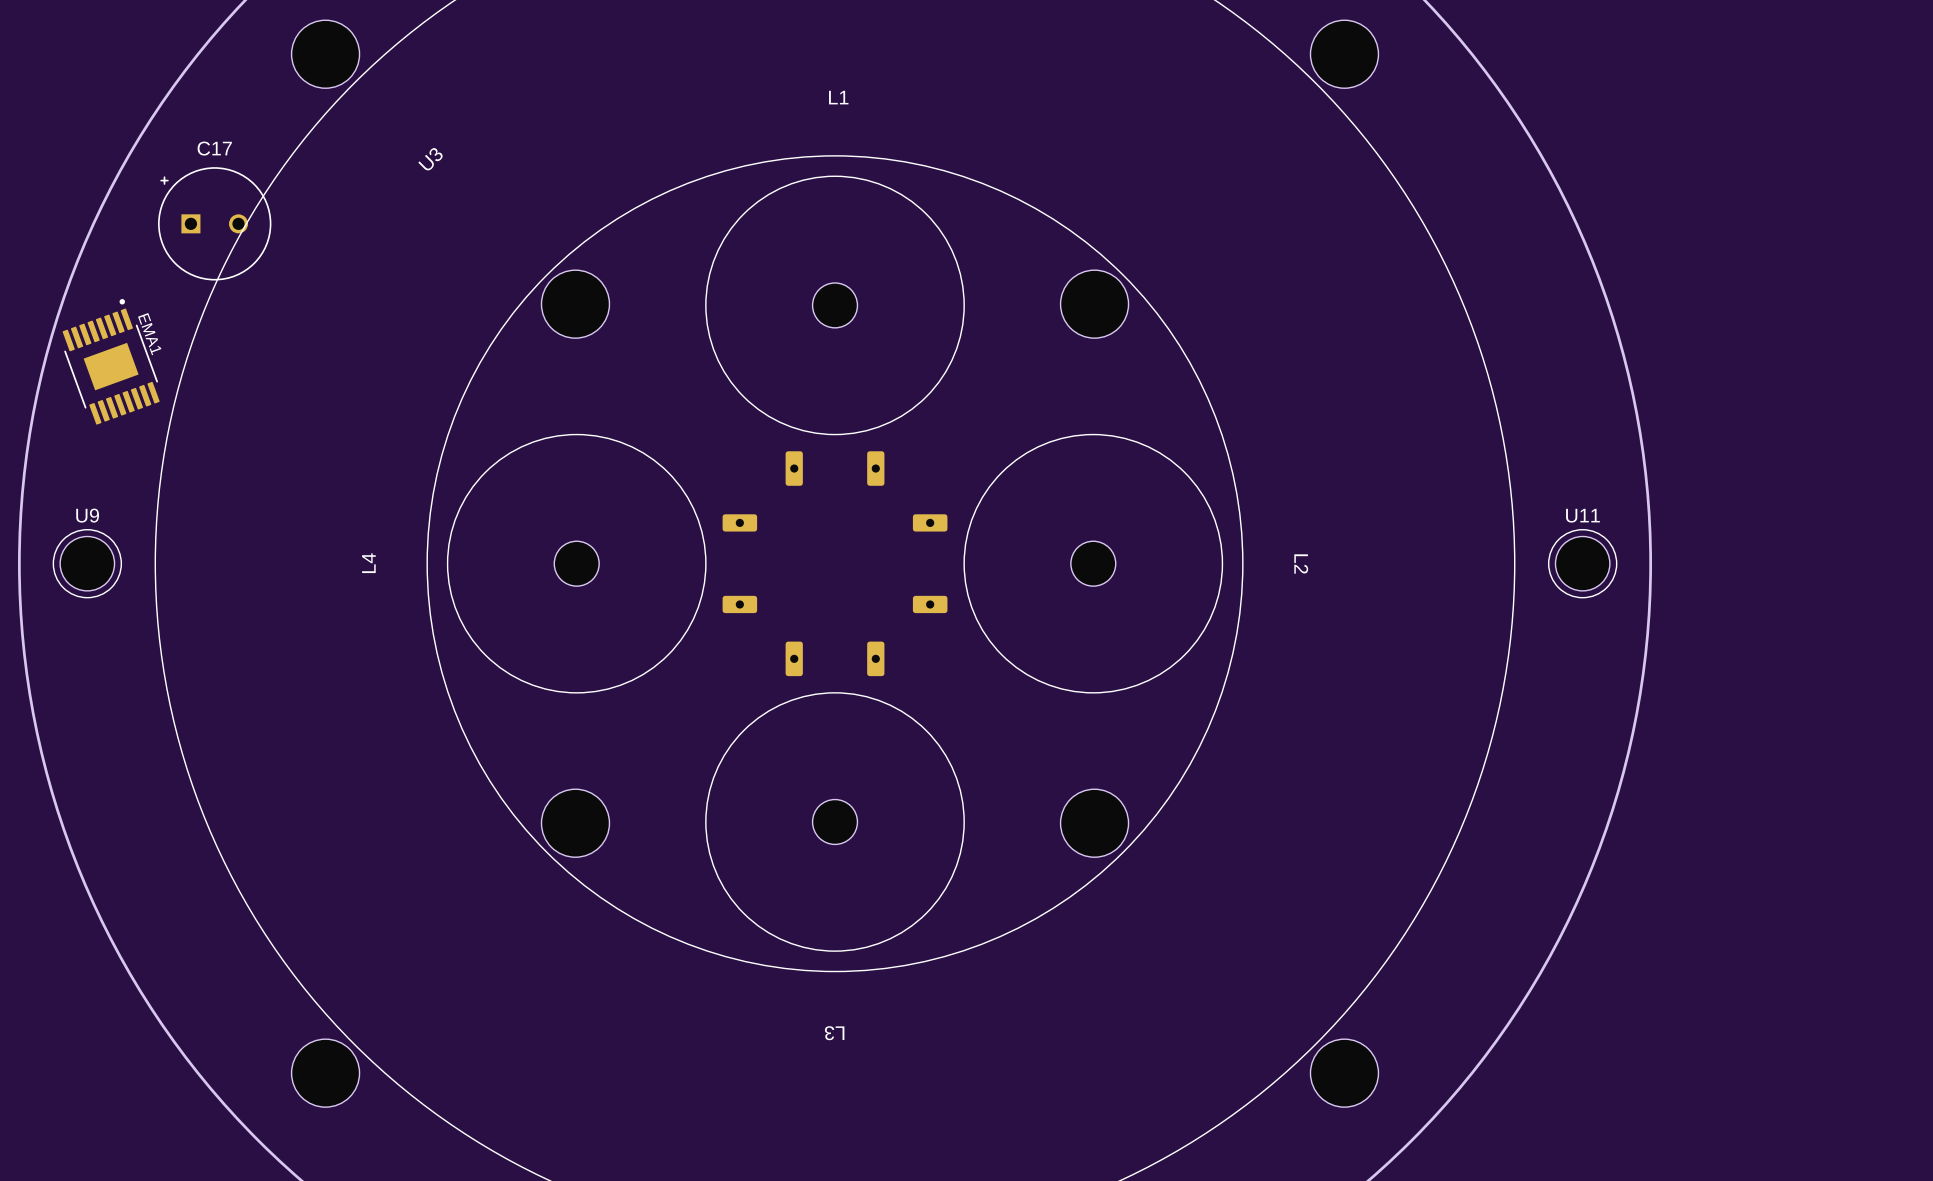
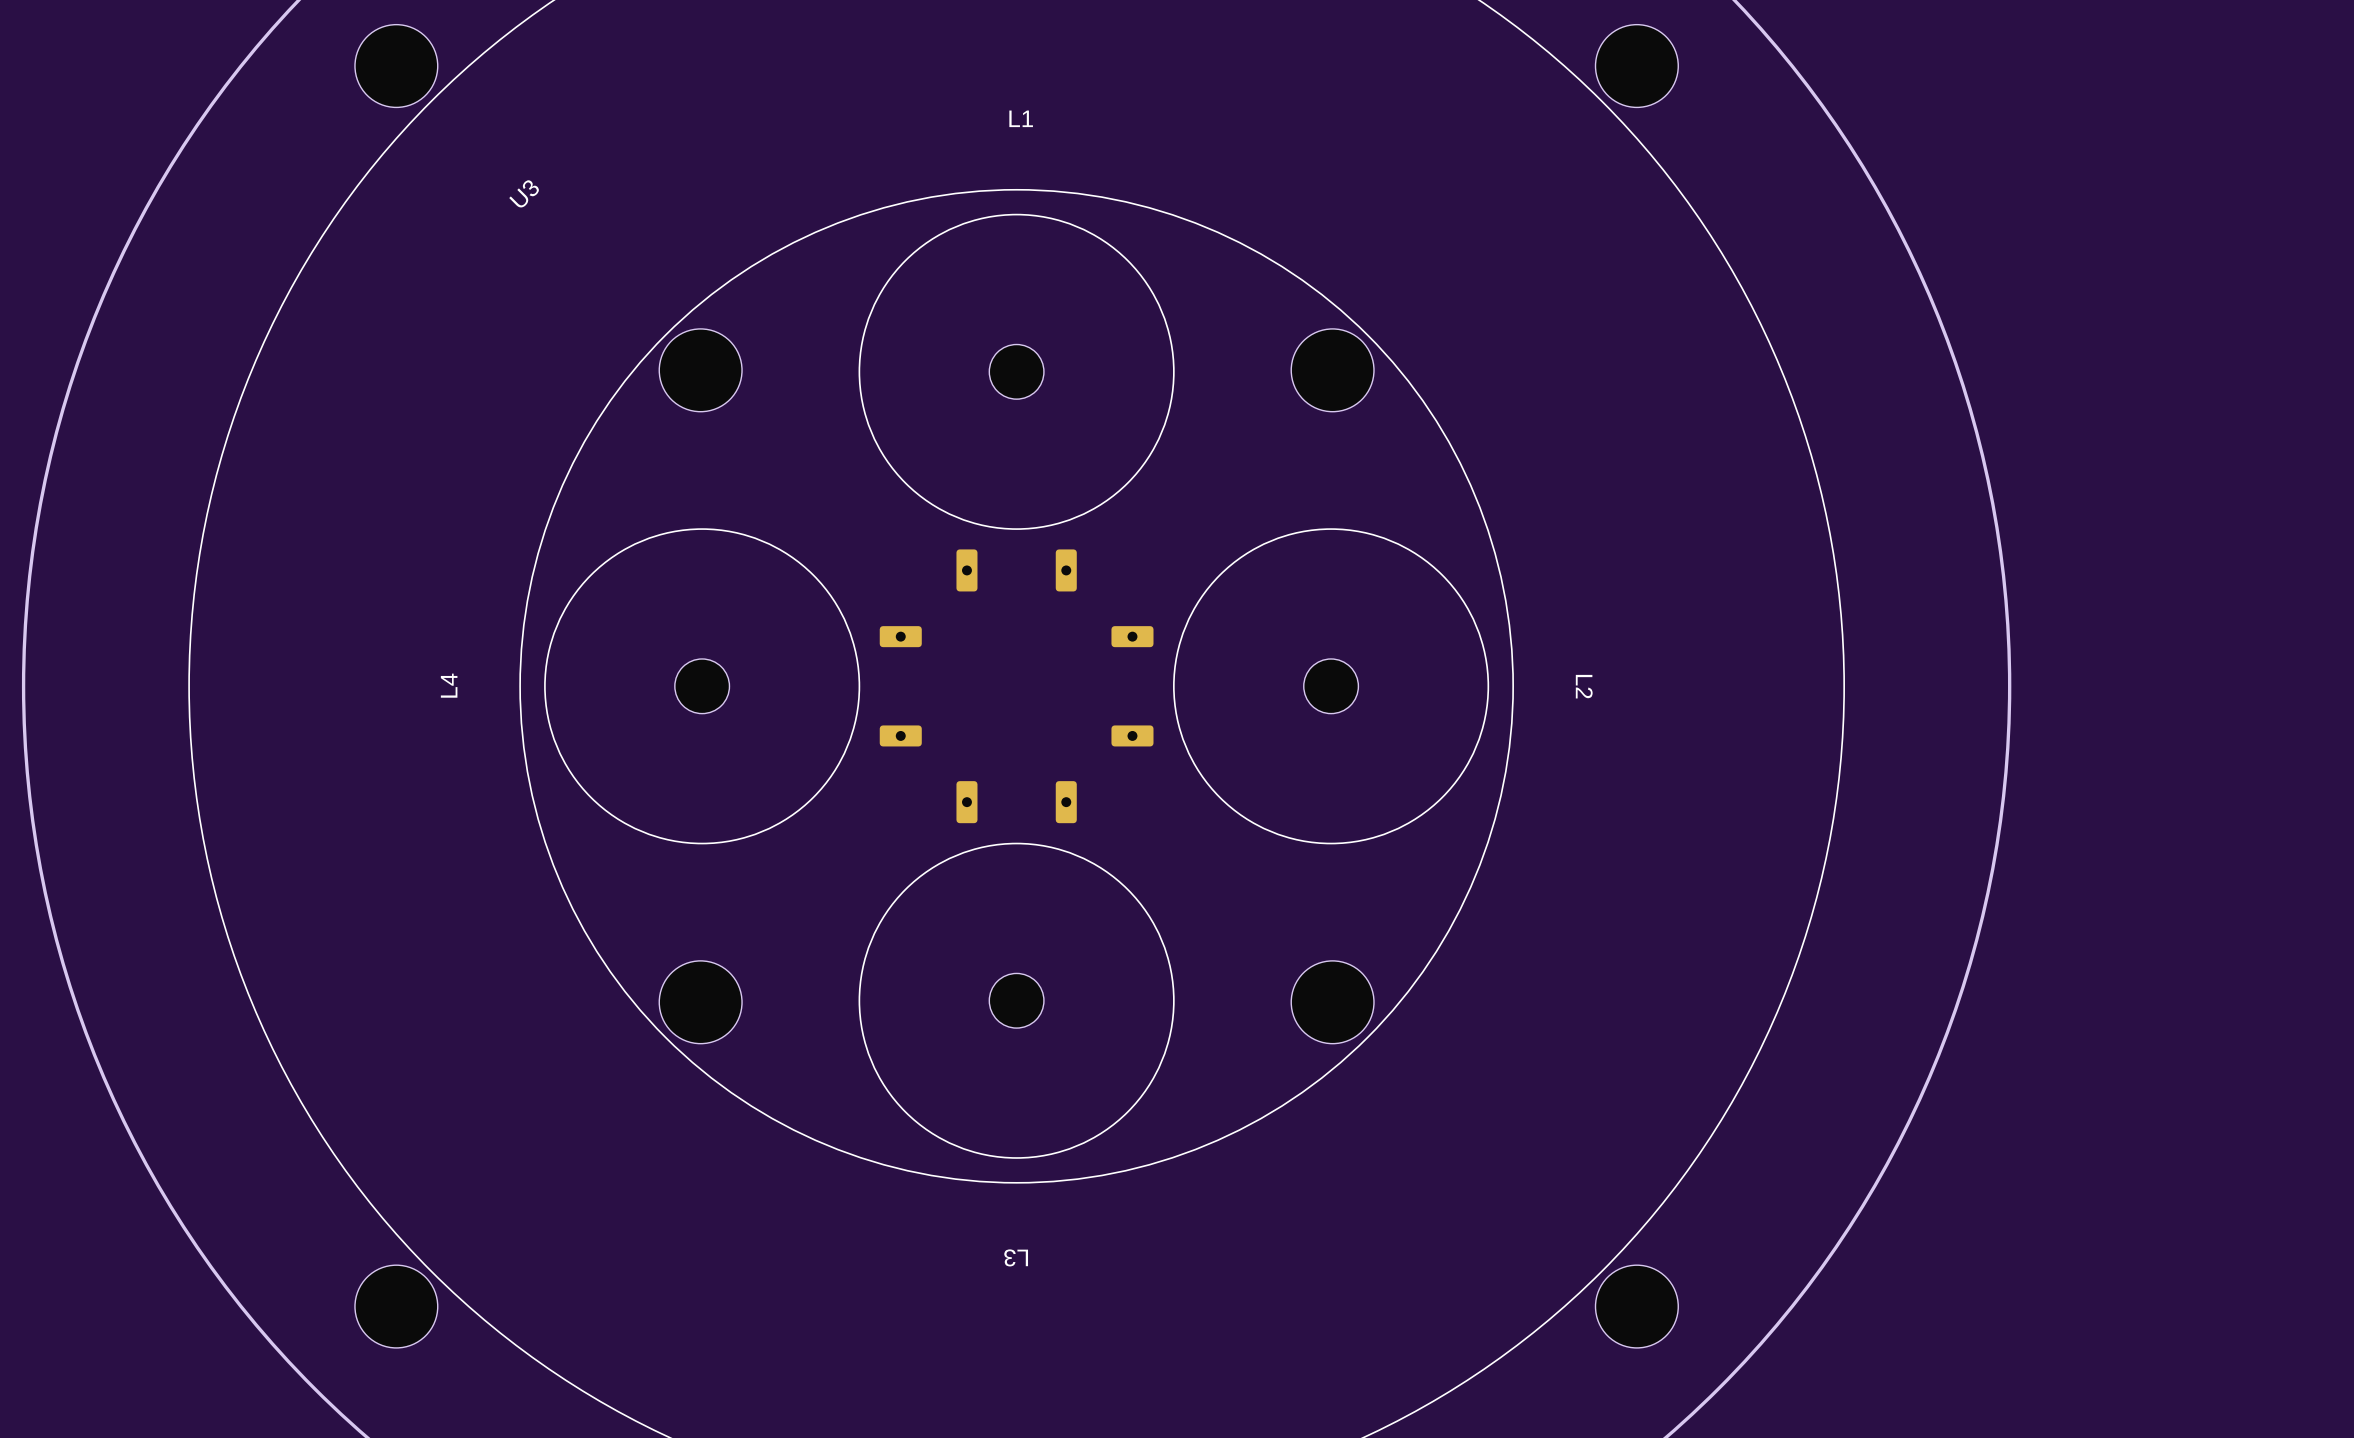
C17: (214, 223) -> none
EMA1: (111, 361) -> none
U9: (87, 563) -> none
U11: (1582, 563) -> none

